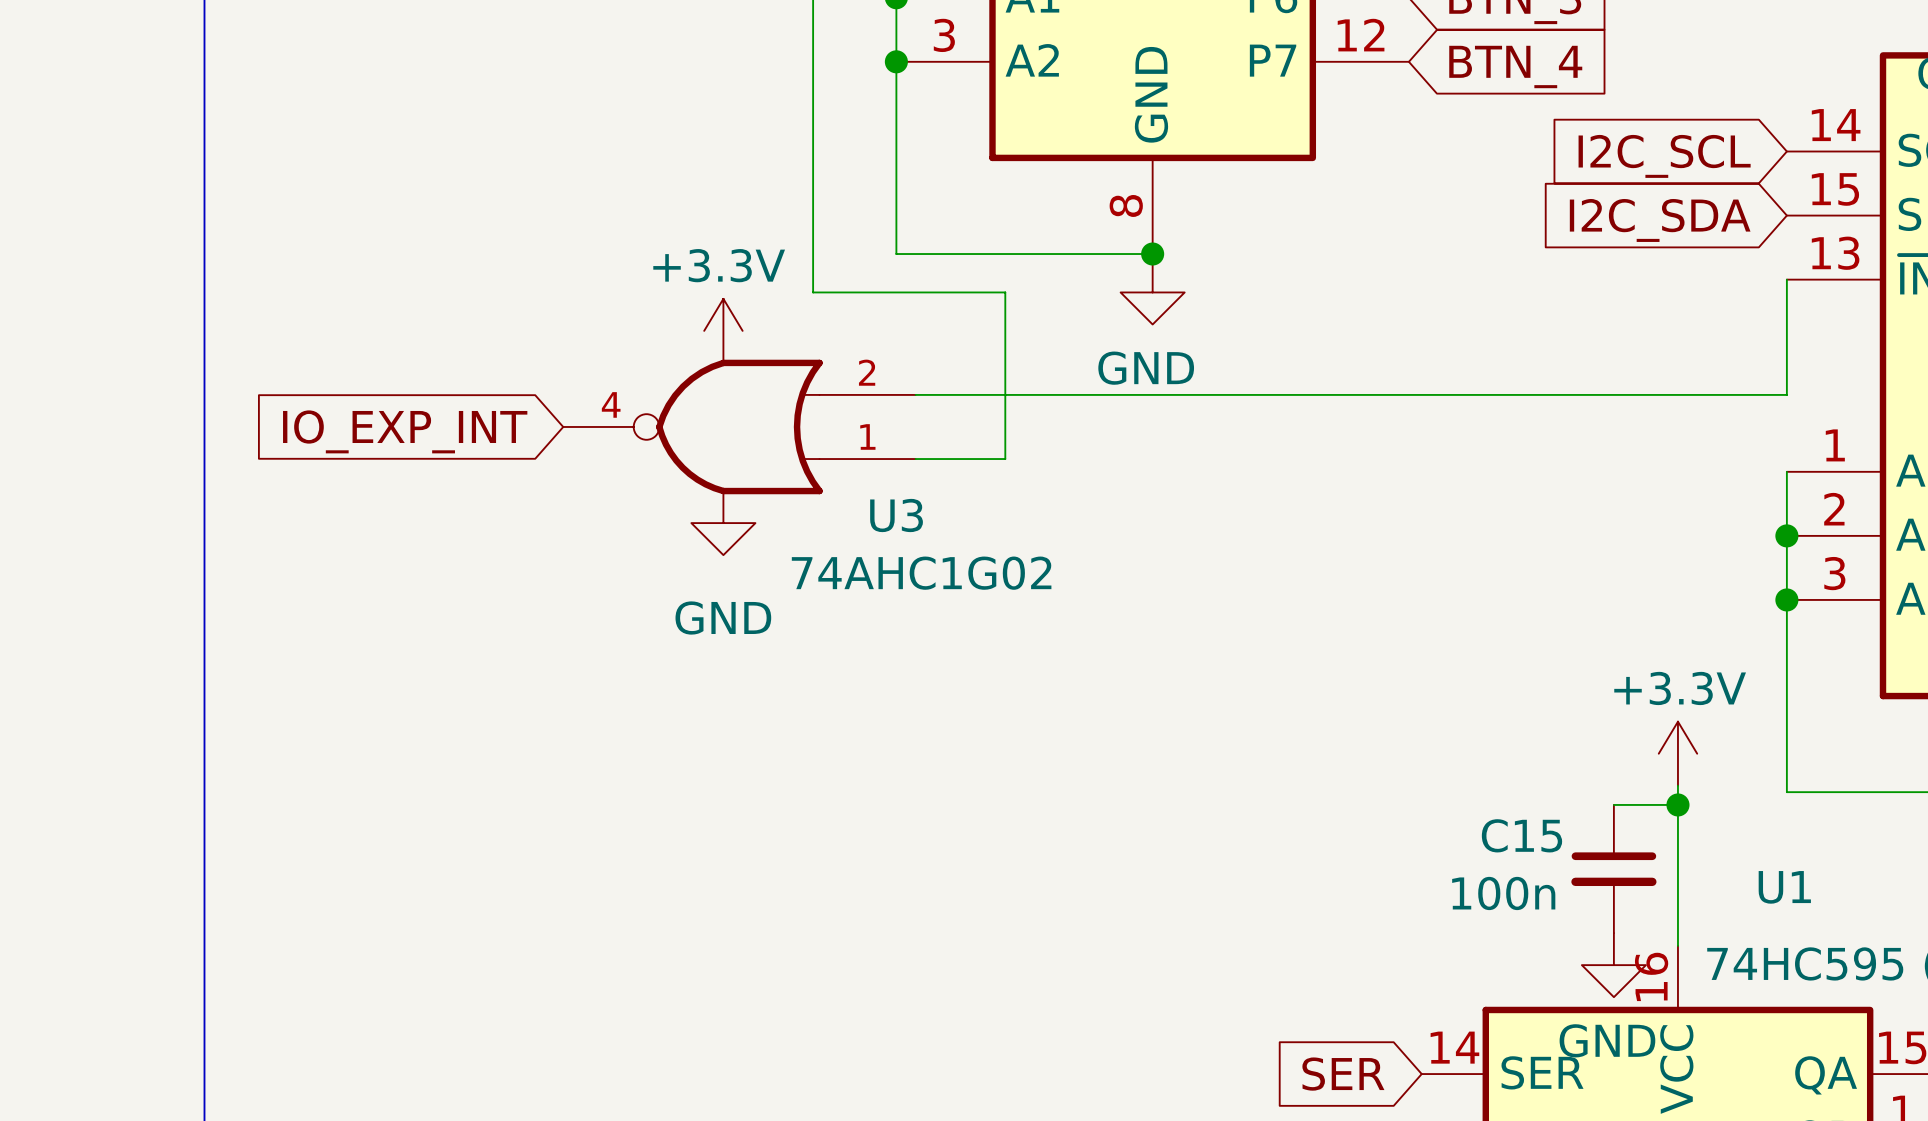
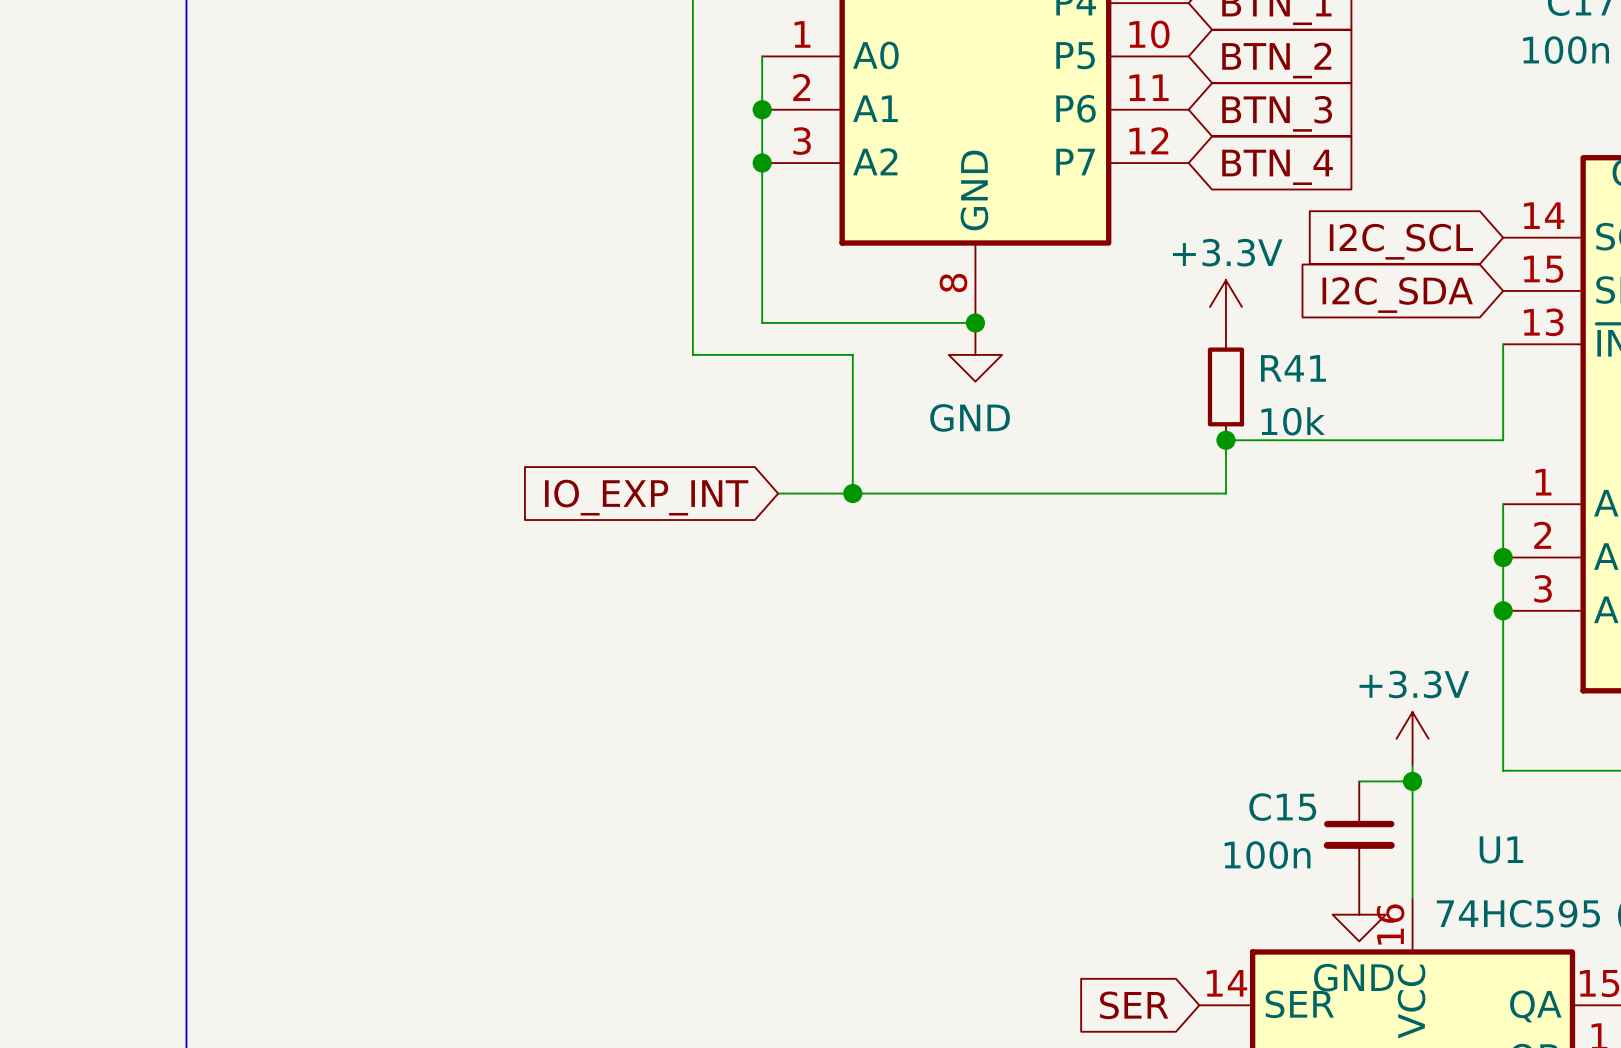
power symbol: none -> +3.3V (1225, 306)
power symbol: +3.3V (723, 330) -> none
R41: none -> 10k (1225, 386)
wire: (915, 394) (1453, 394) -> (852, 493) (1225, 493) (1225, 440)
junction: none -> (1225, 440)
U3: 74AHC1G02 (739, 426) -> none
global label position: IO_EXP_INT (405, 431) -> IO_EXP_INT (646, 497)
junction: none -> (852, 493)
power symbol: GND (723, 523) -> none

